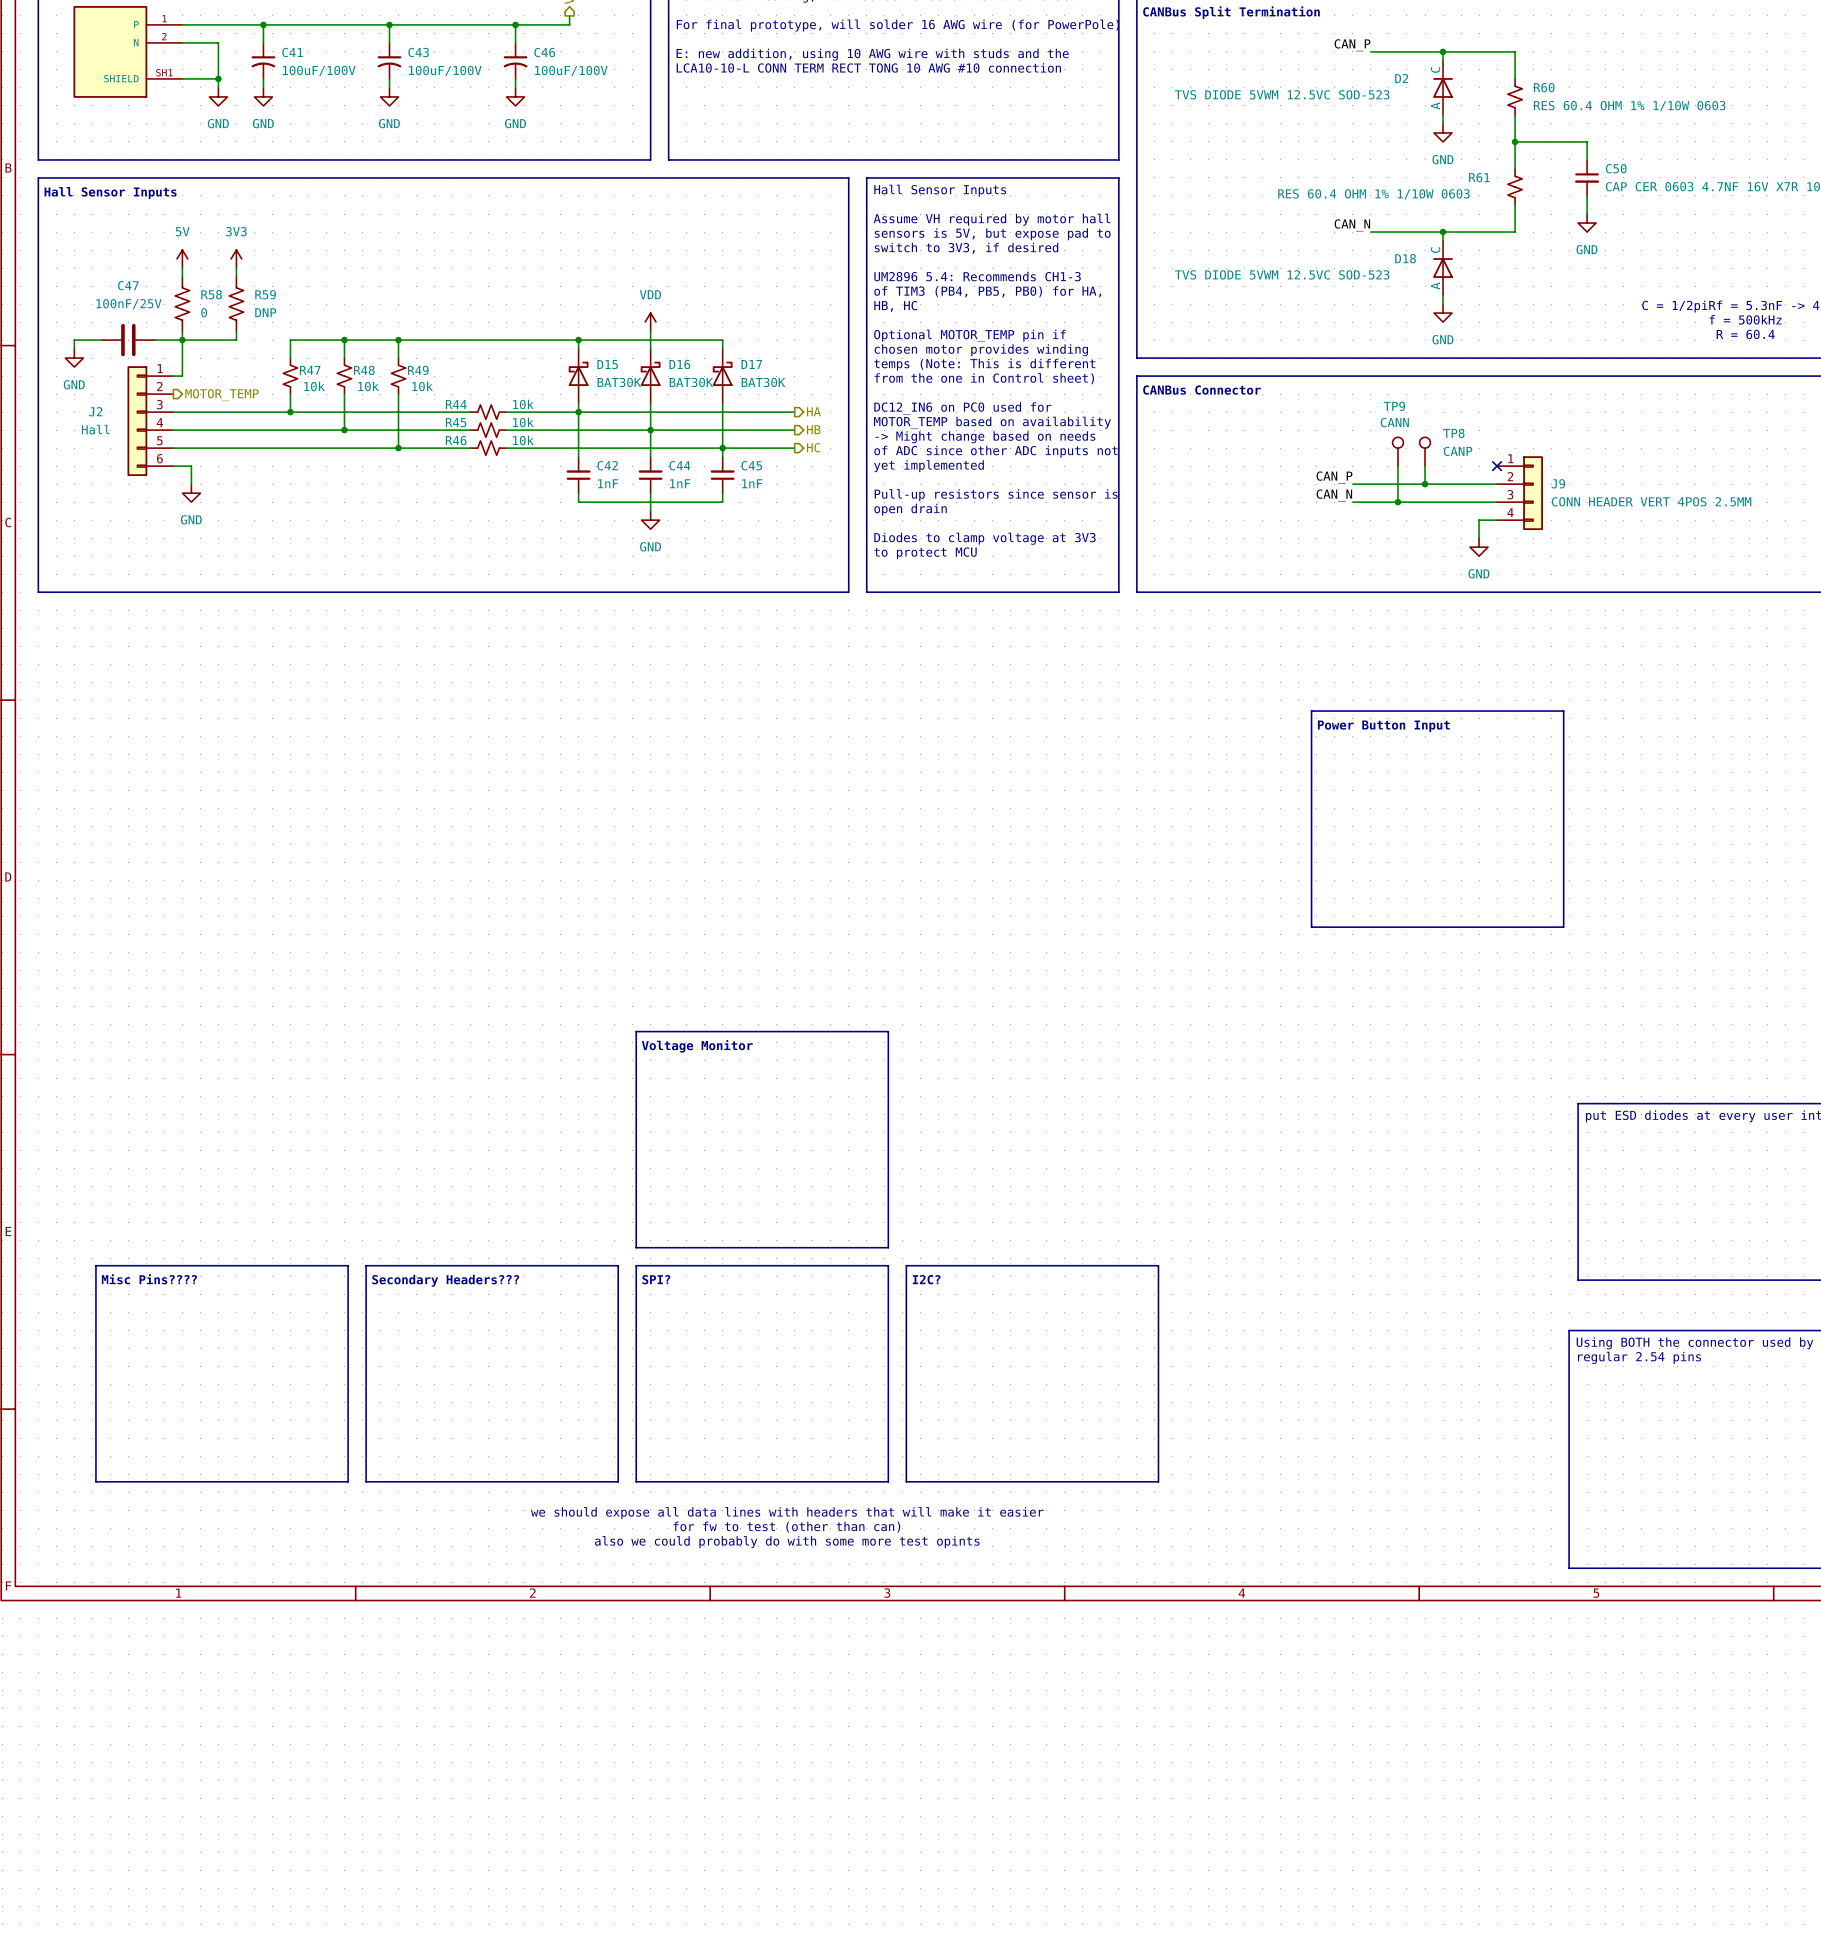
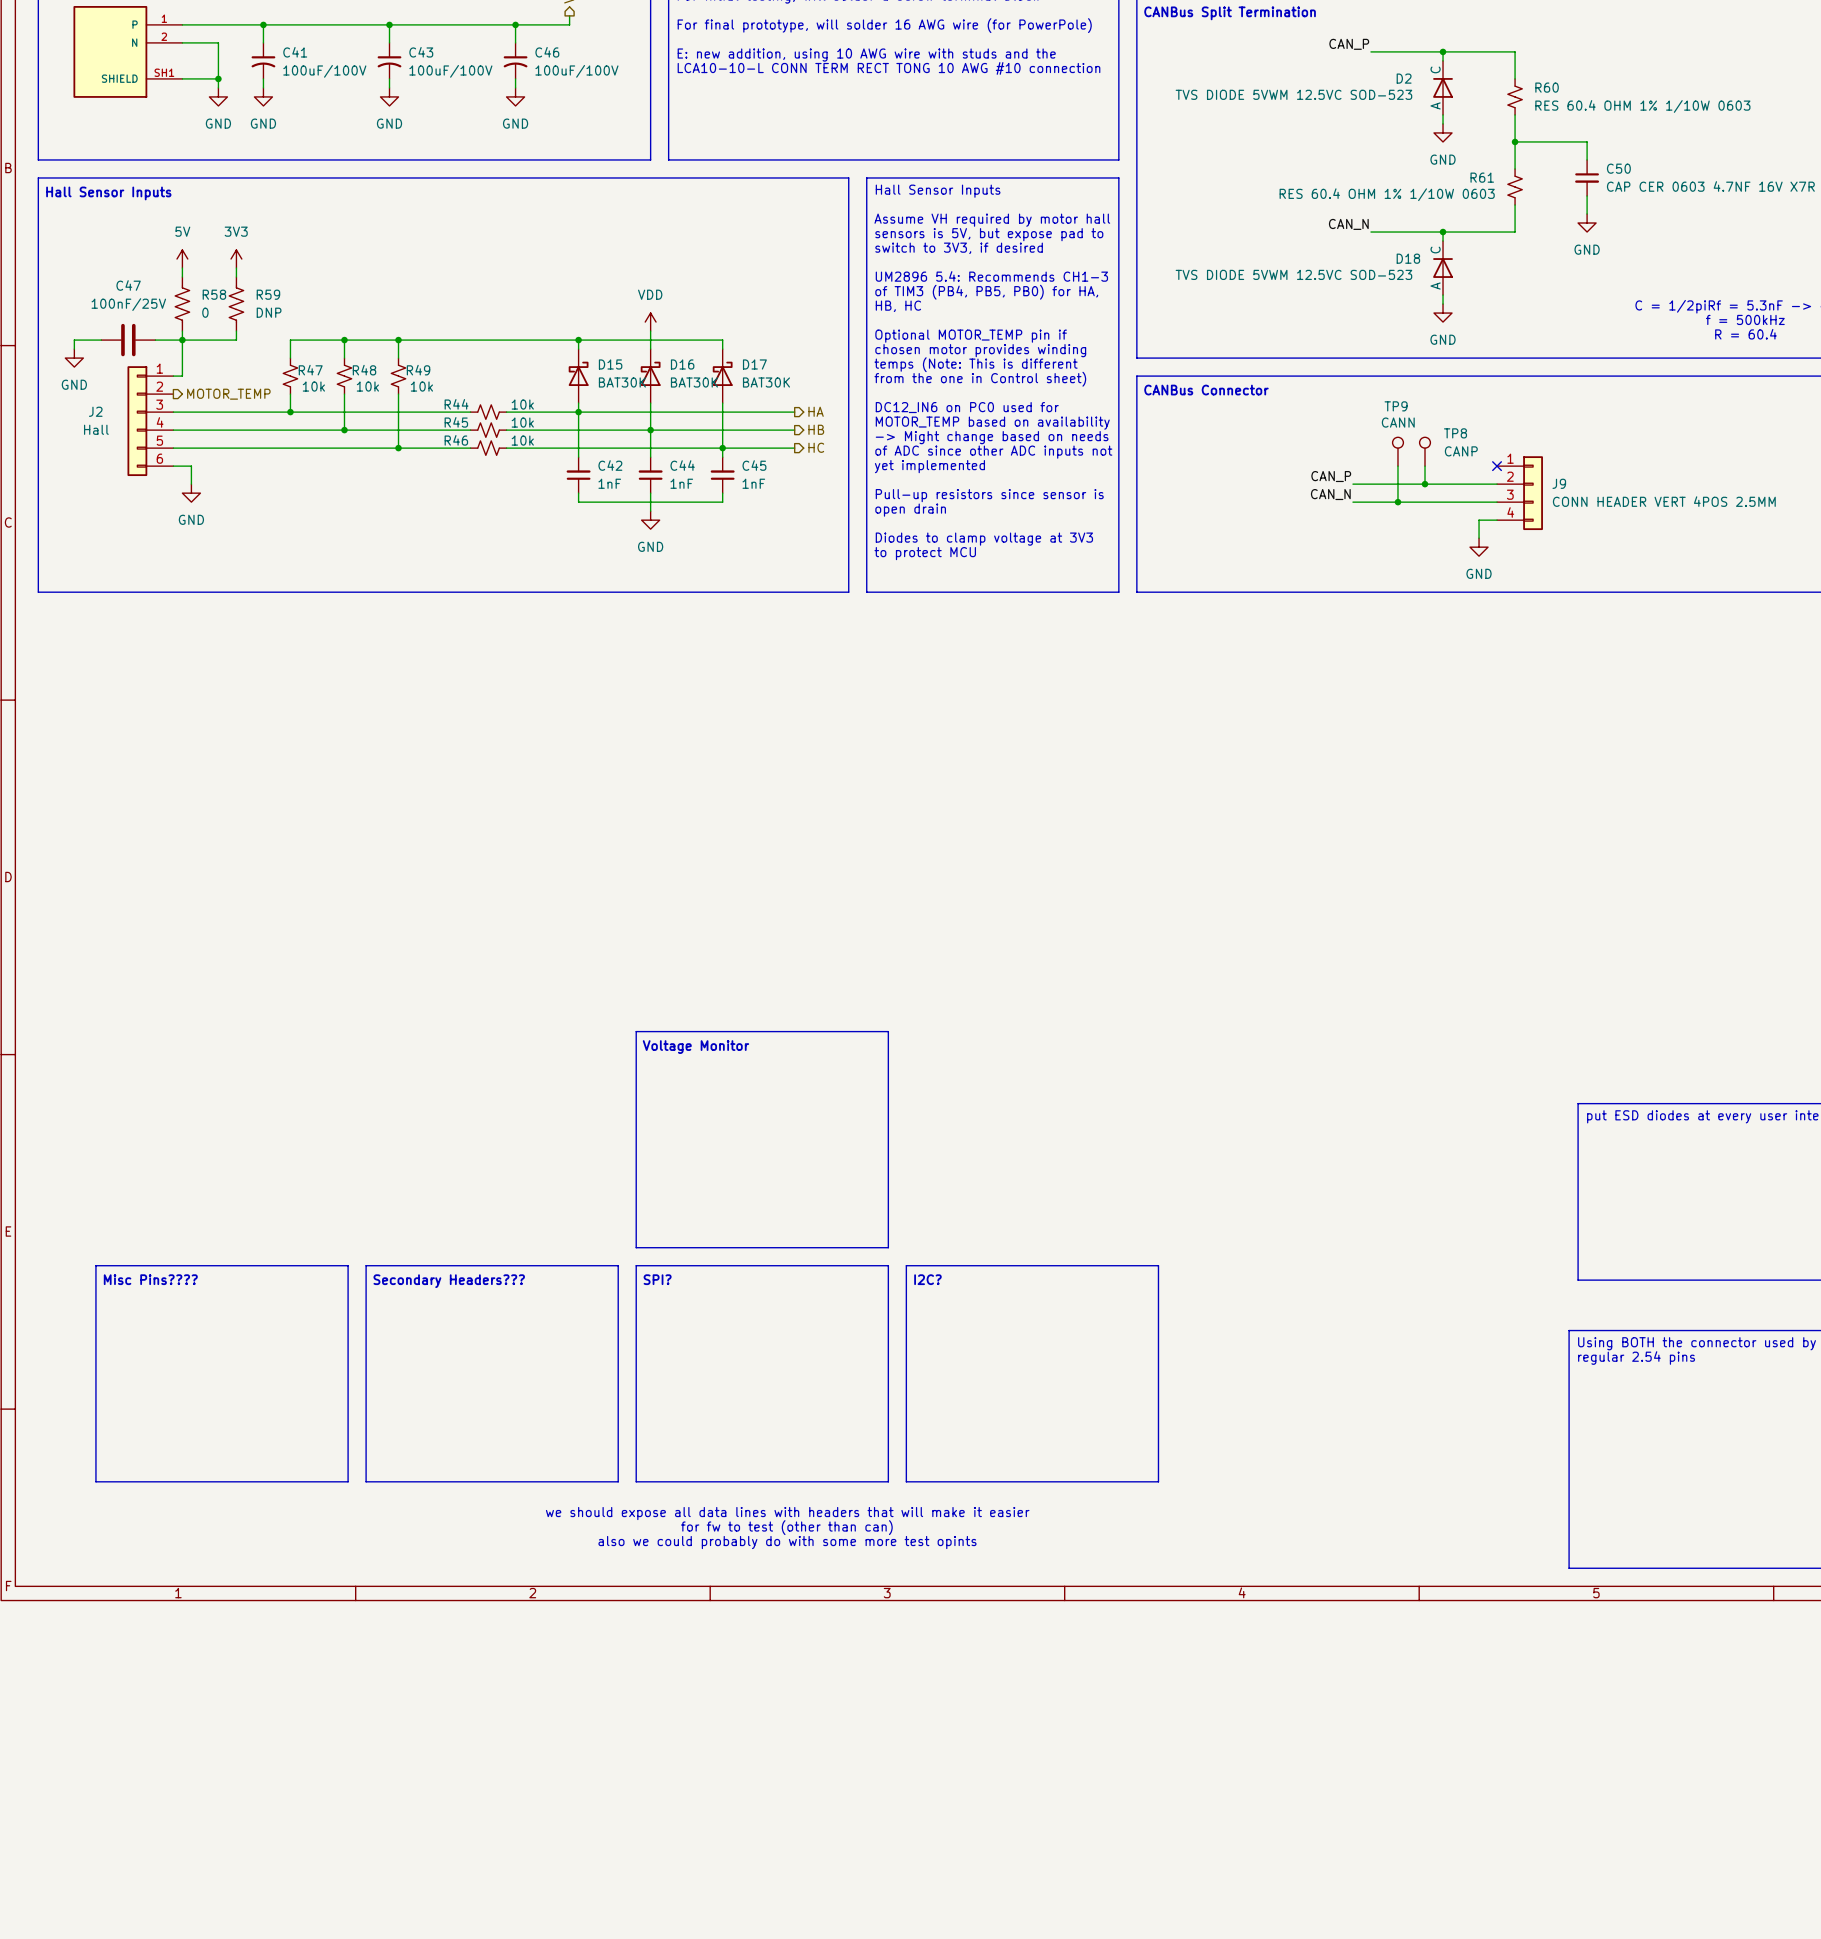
line: (1311, 711) (1563, 711) (1563, 927) (1311, 927) (1311, 711) -> none
text: Power Button Input (1383, 726) -> none

